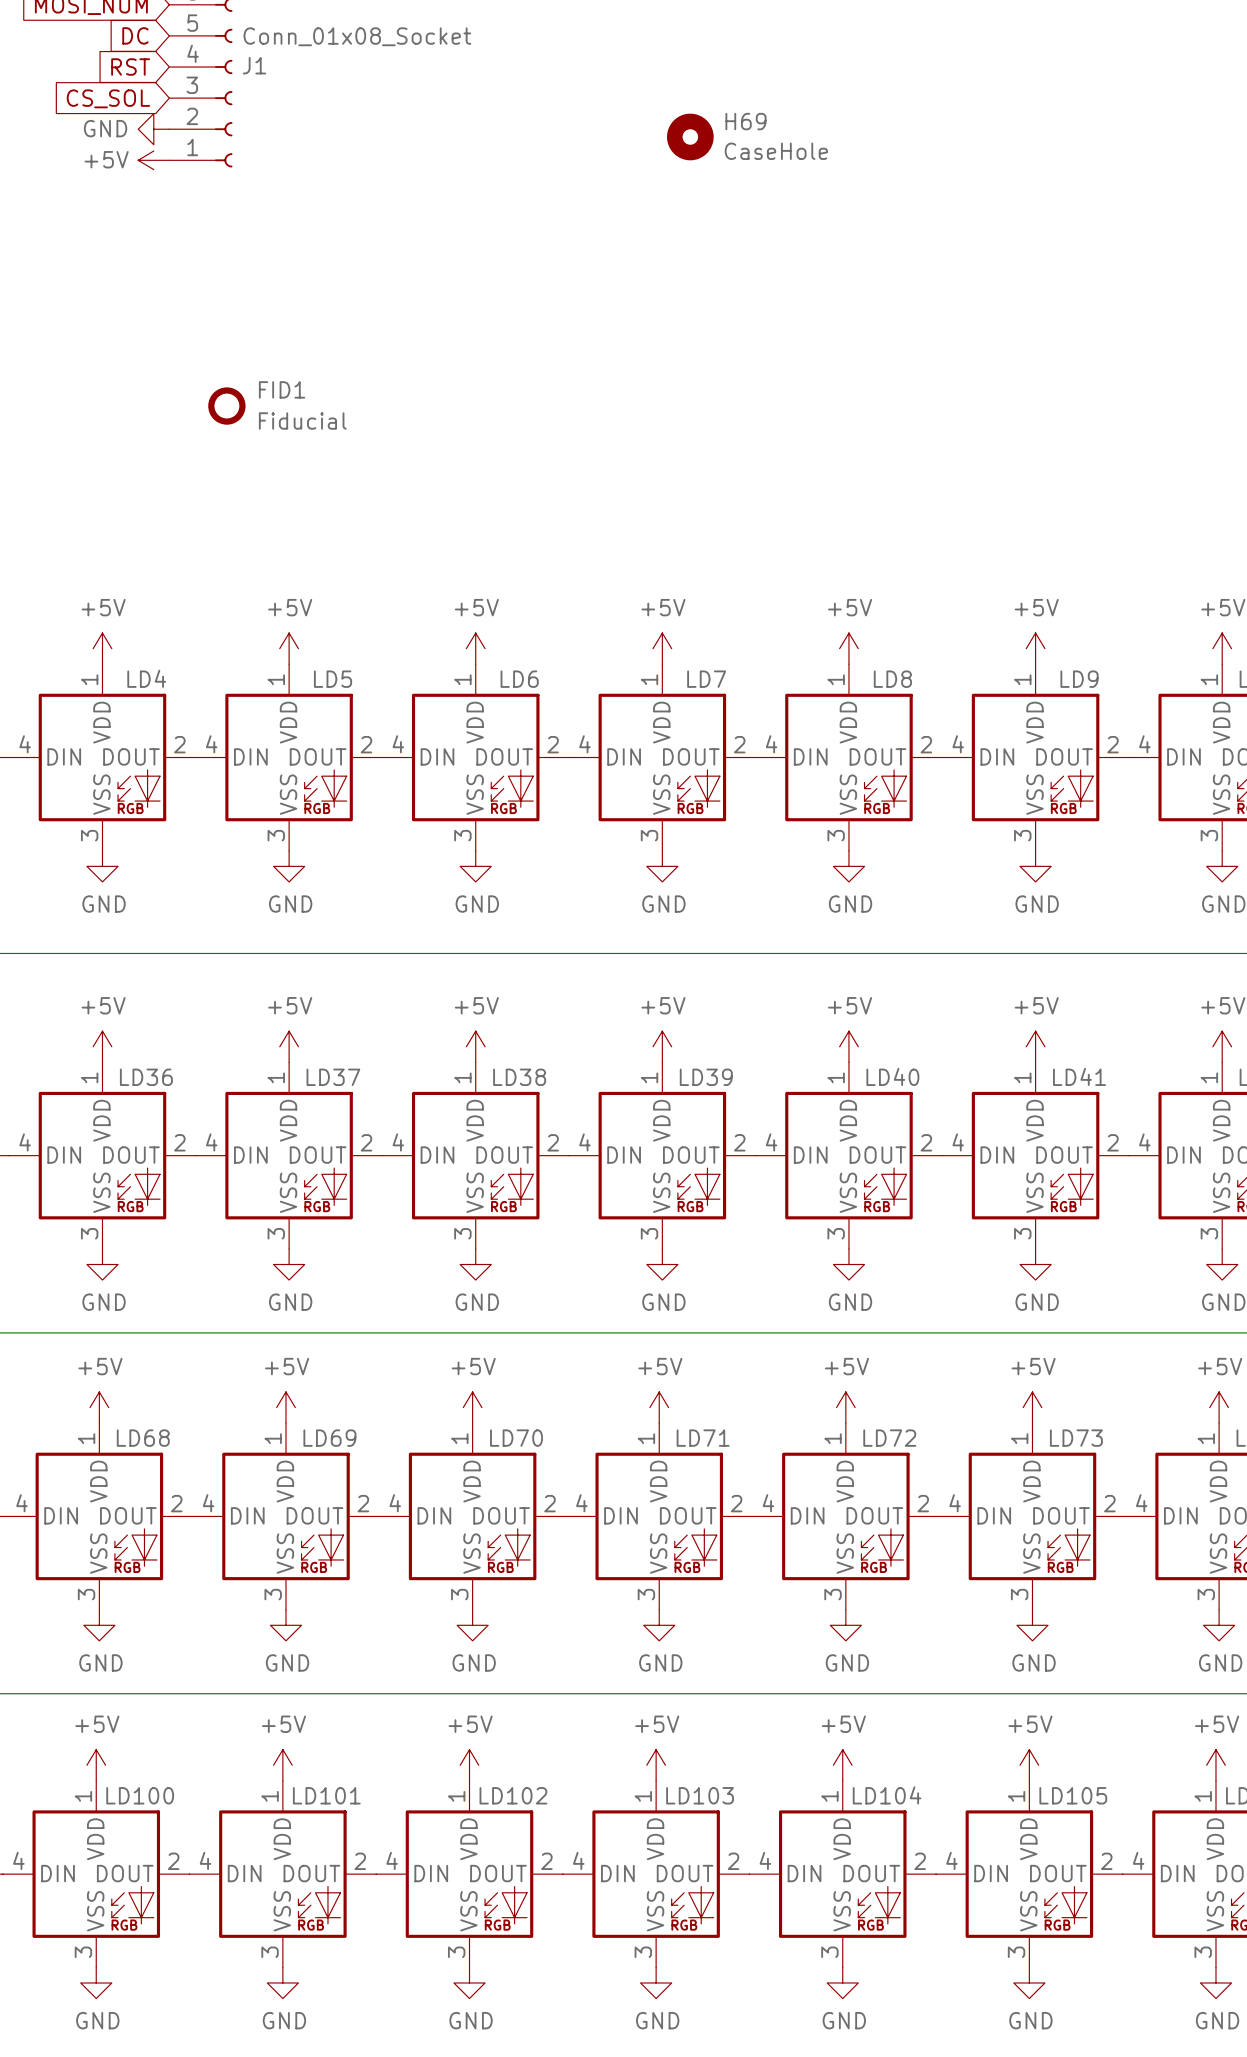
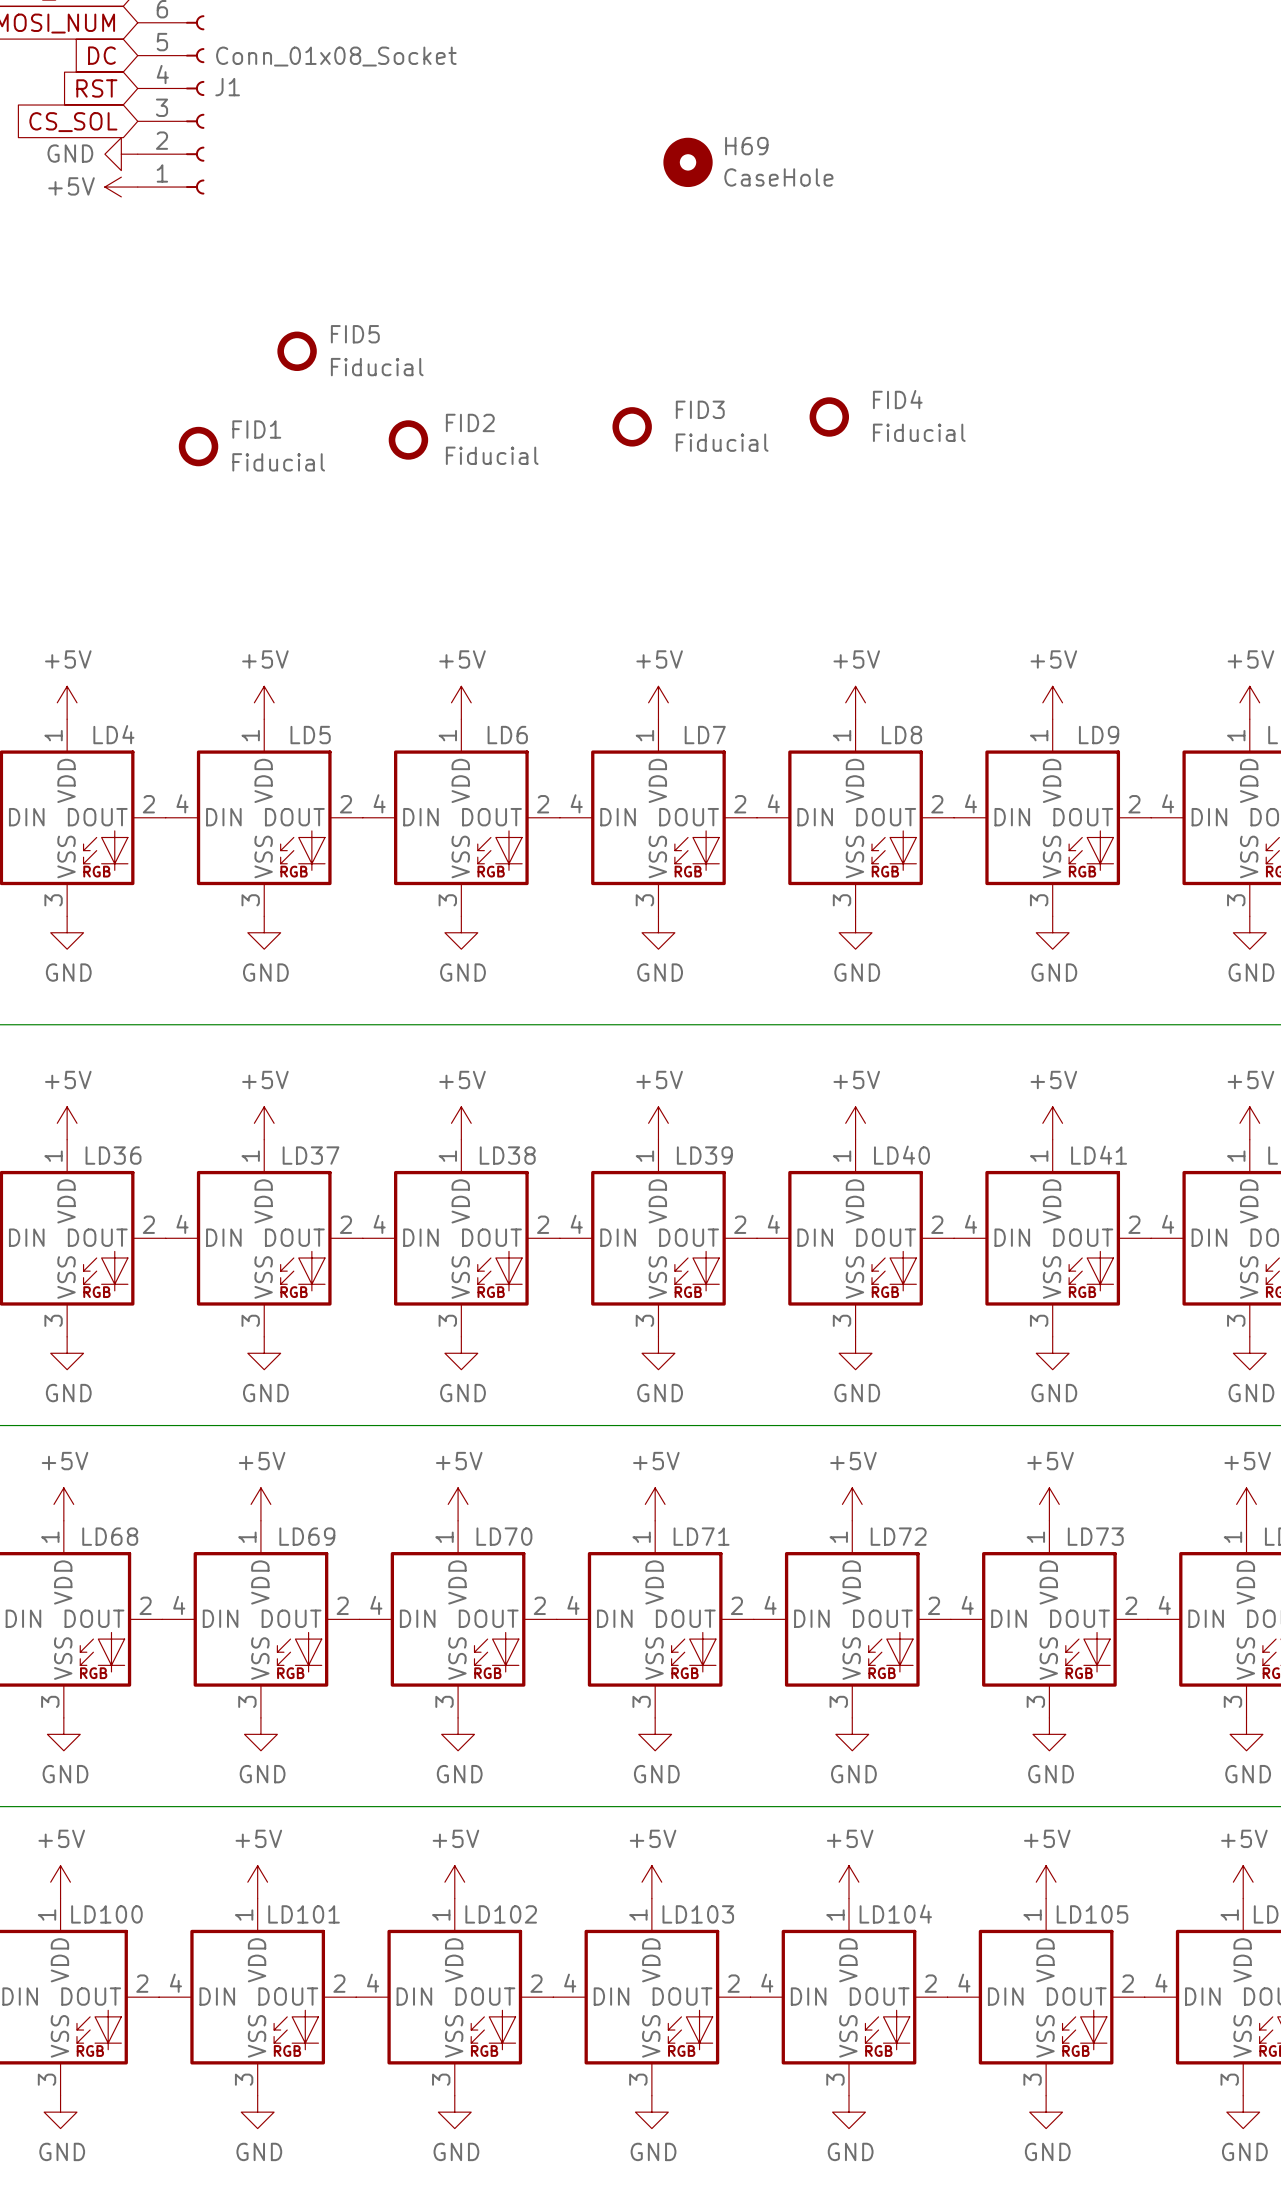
FID5: none -> Fiducial (297, 351)
FID4: none -> Fiducial (829, 416)
FID3: none -> Fiducial (632, 426)
FID2: none -> Fiducial (408, 439)

